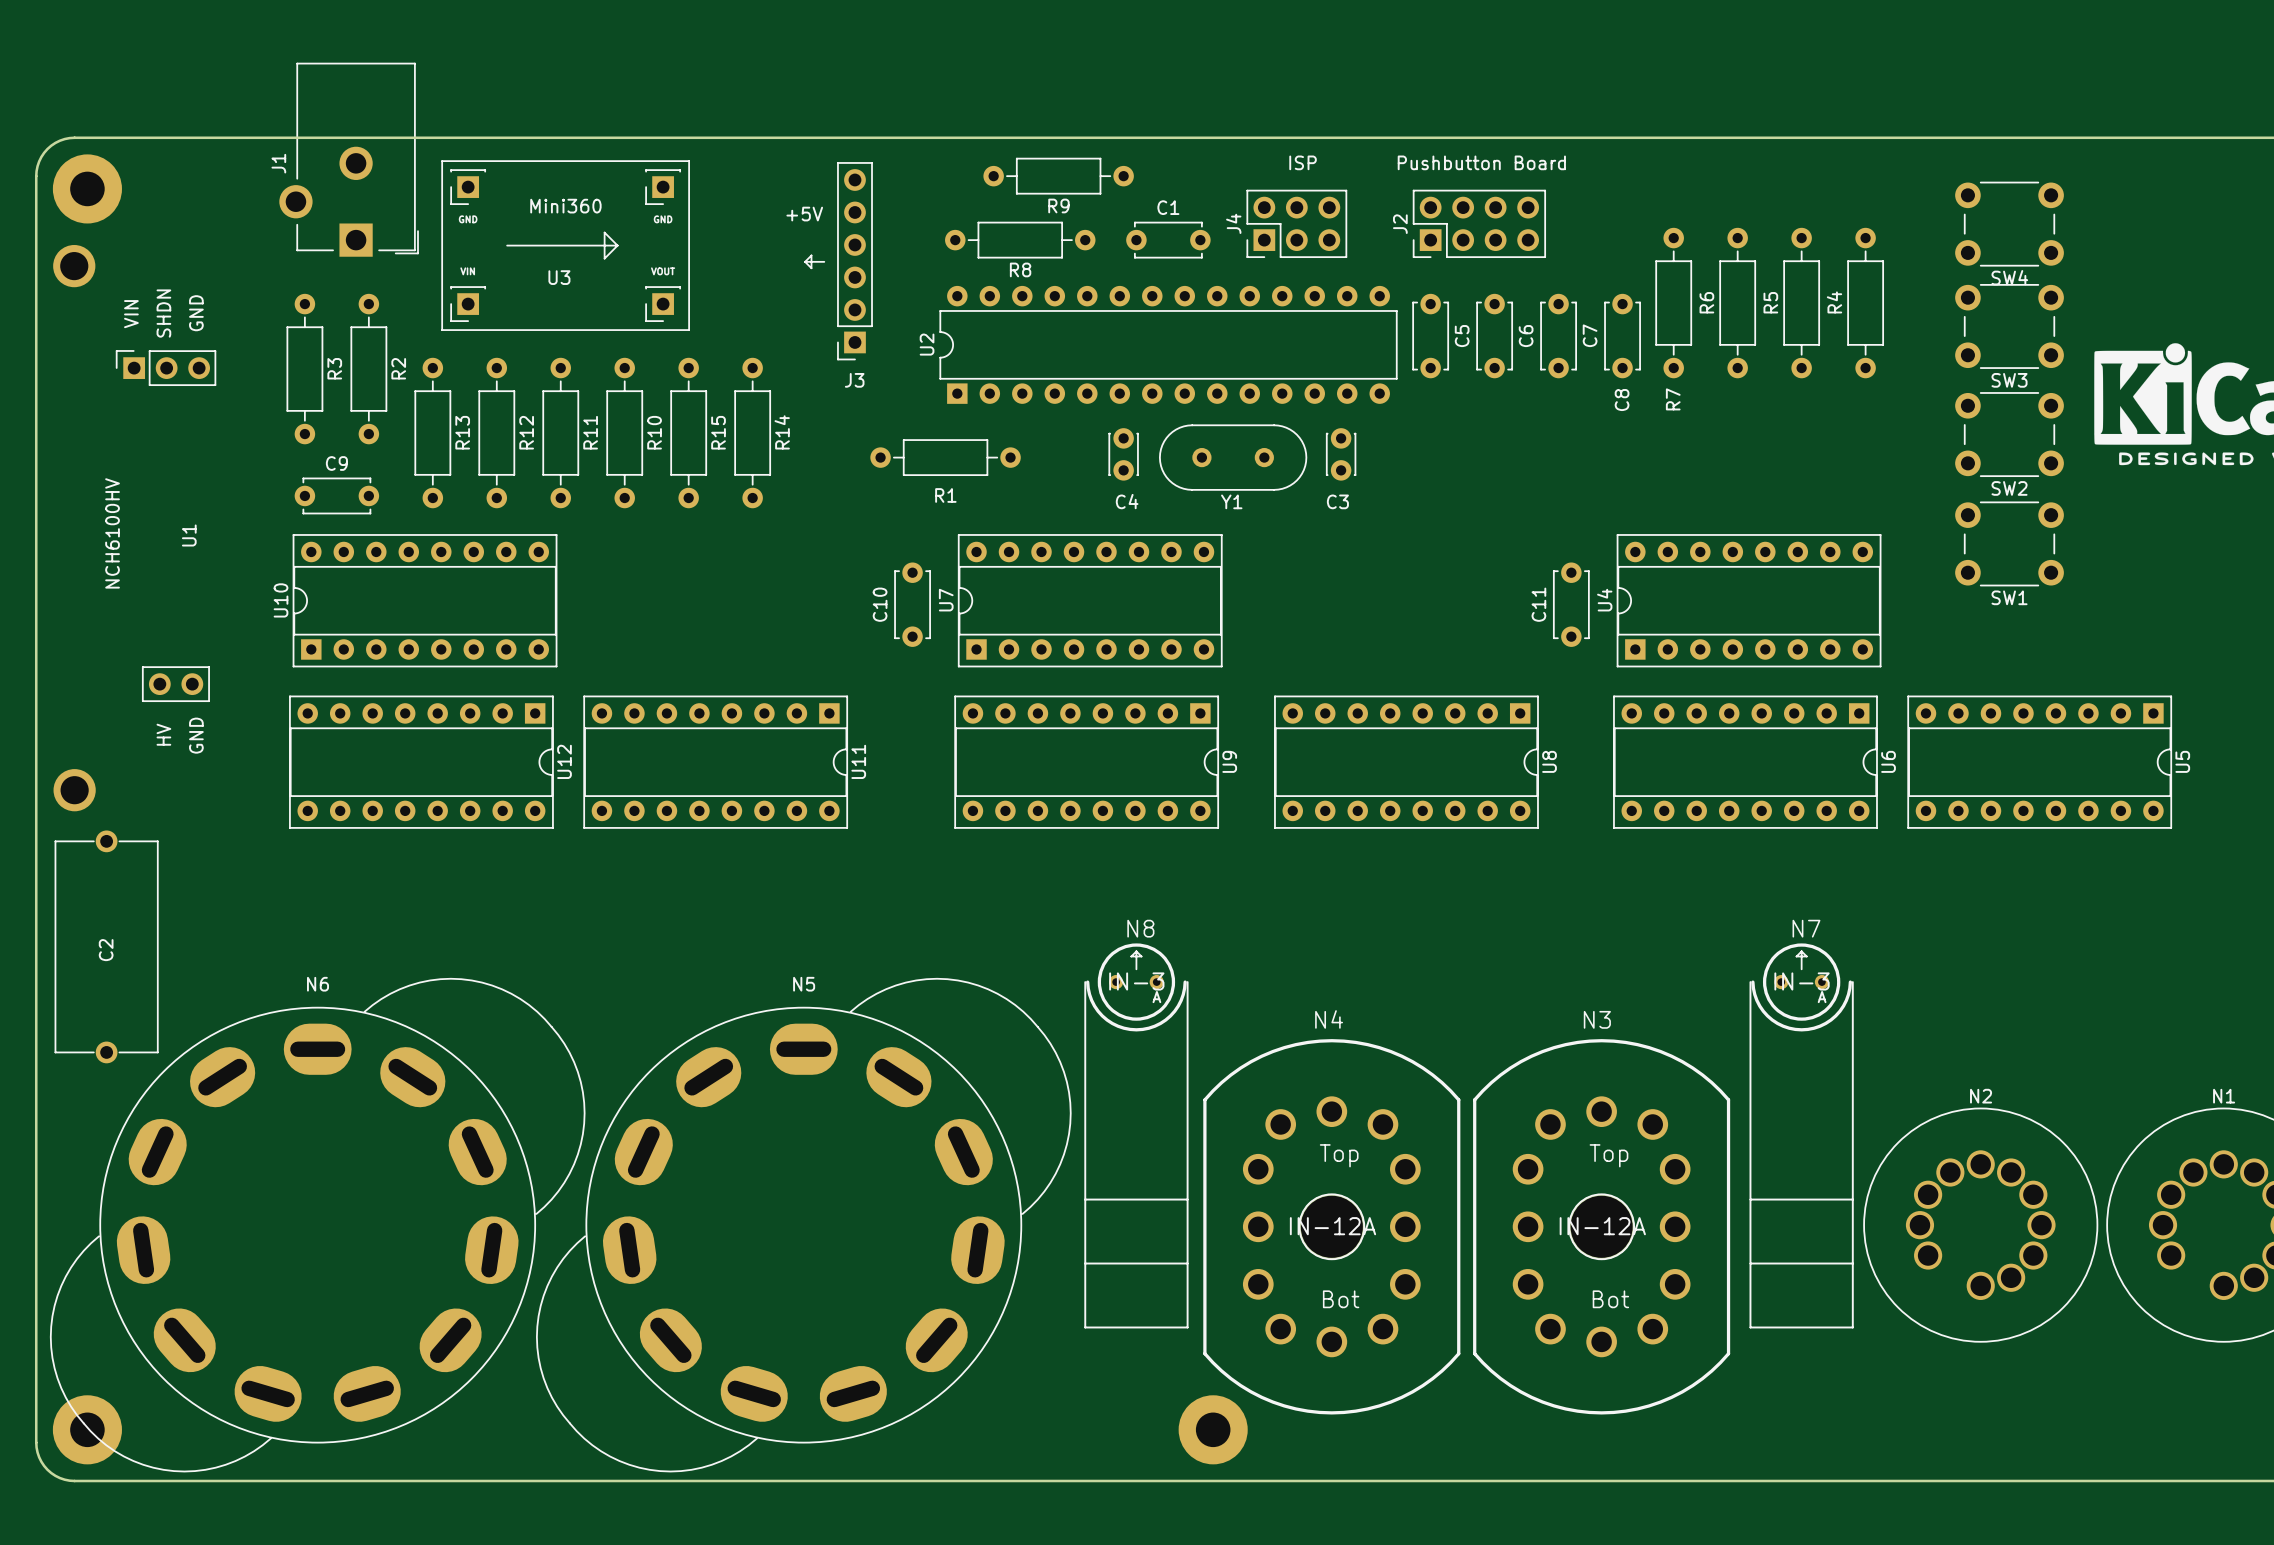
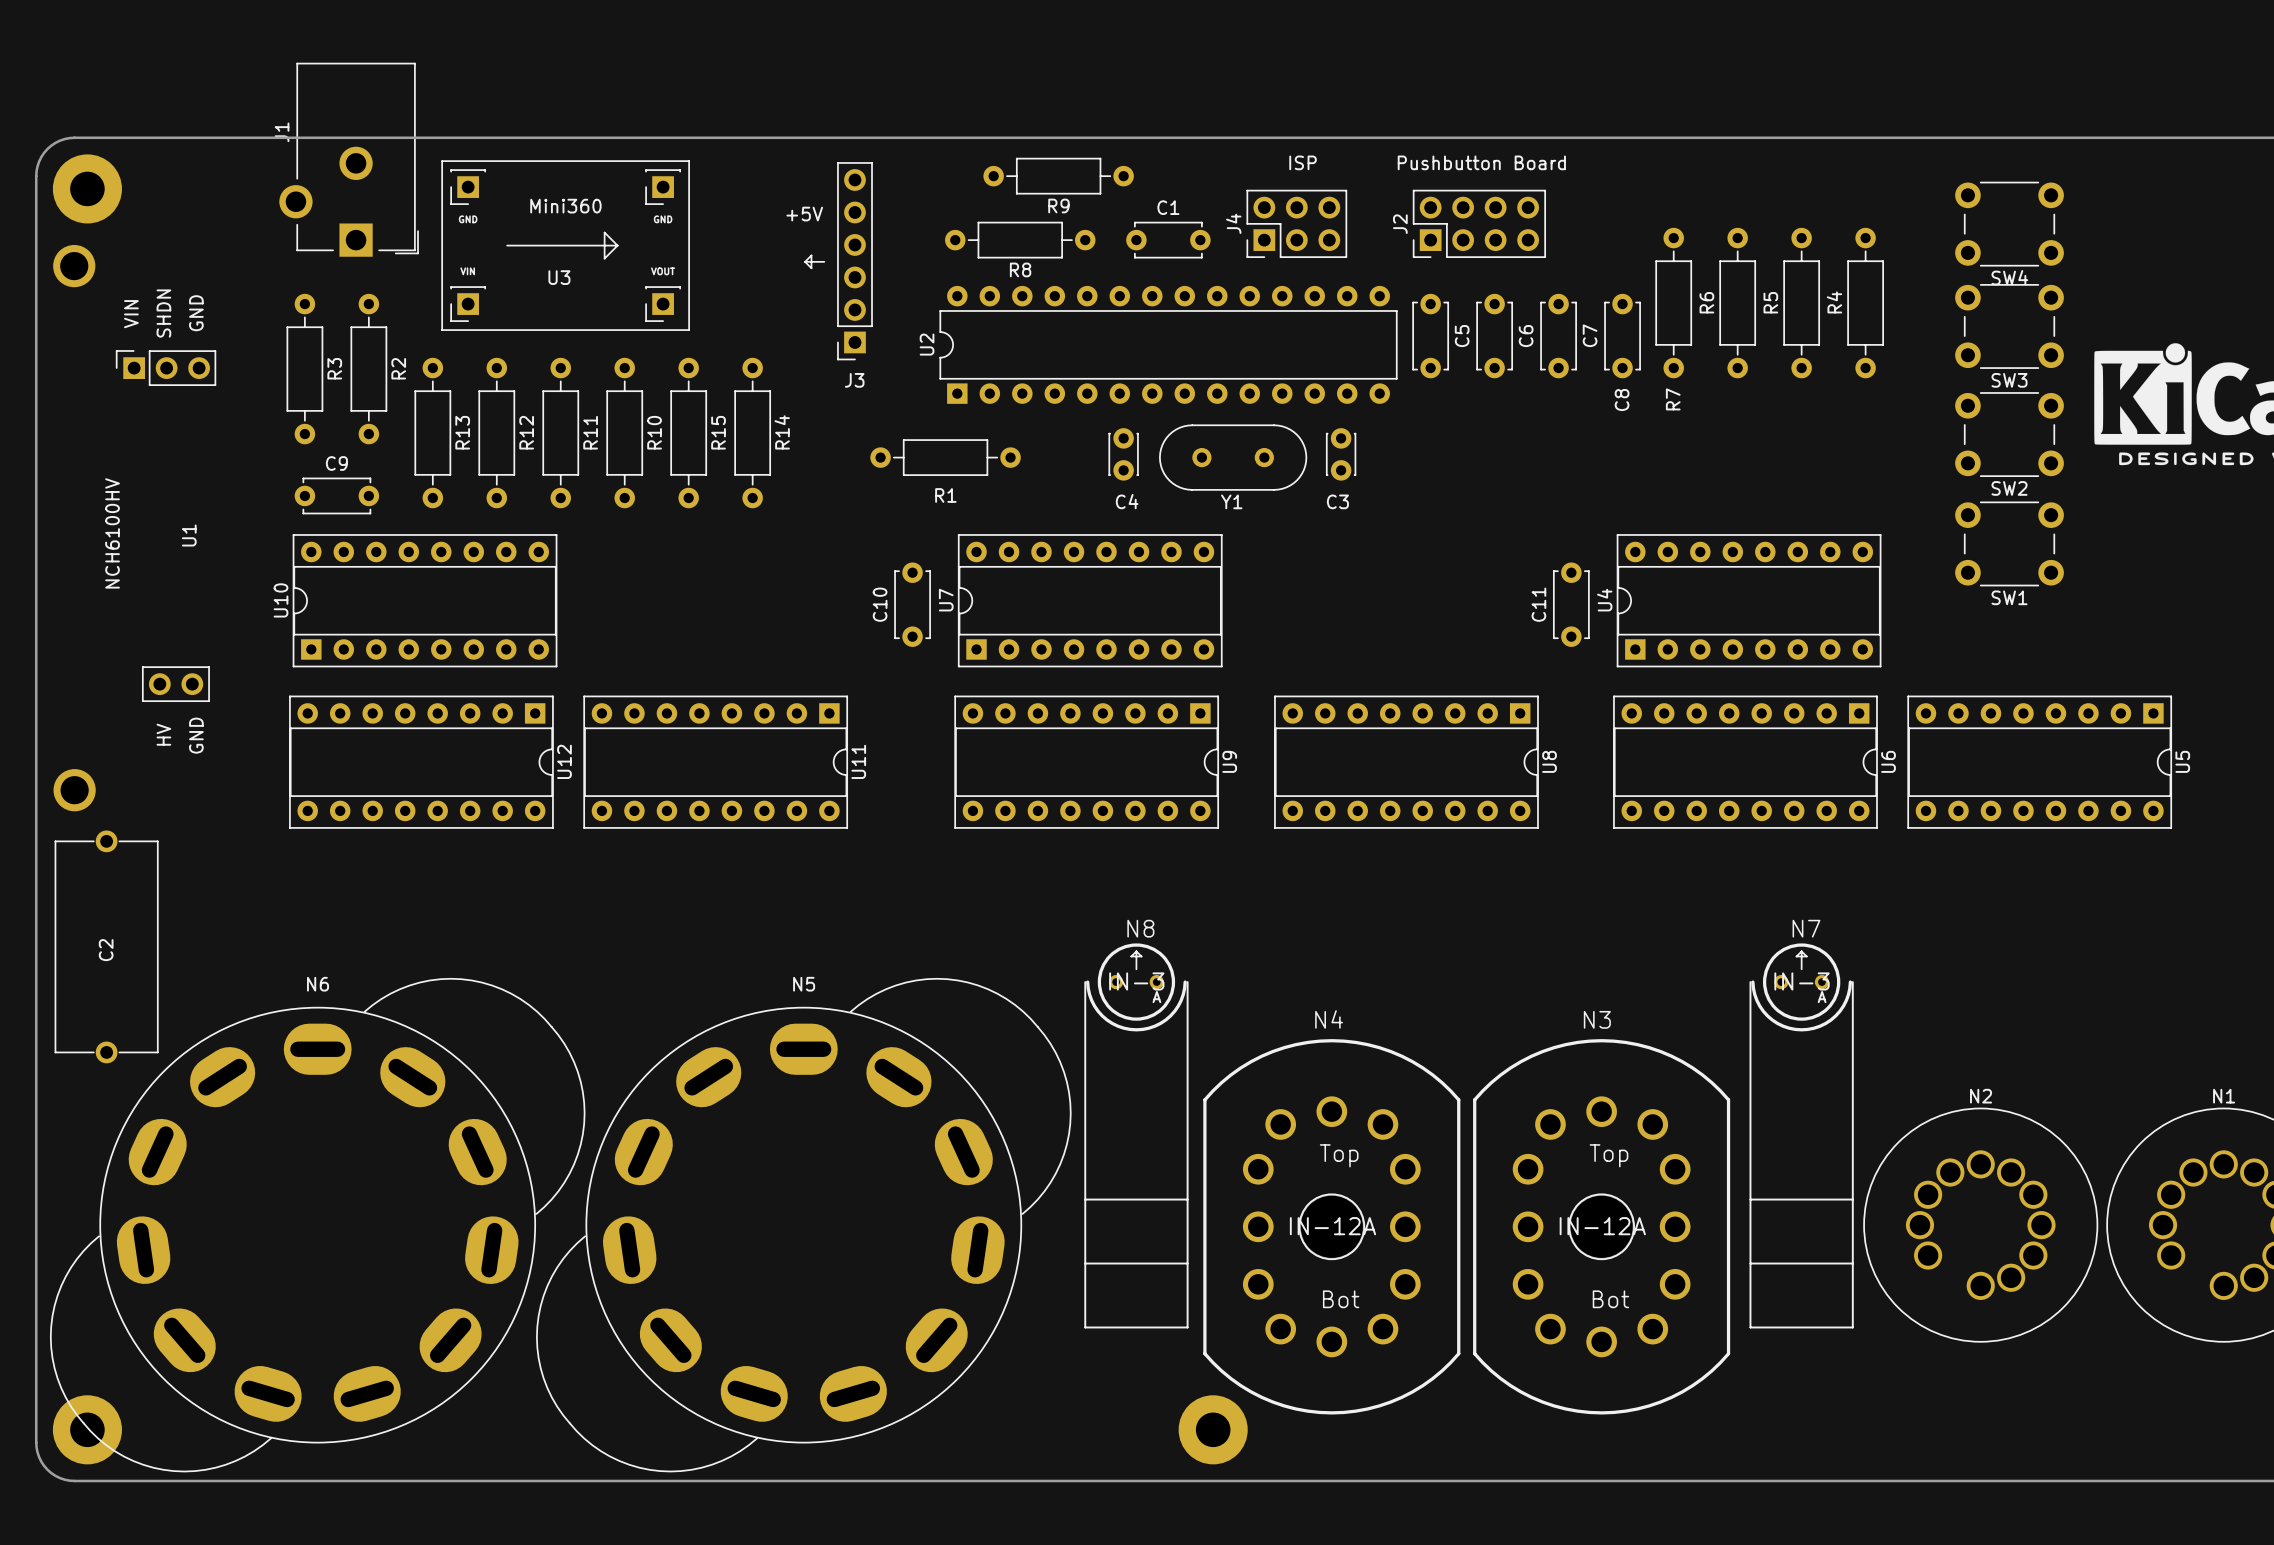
J1 name position: J1 (278, 163) -> J1 (282, 132)

